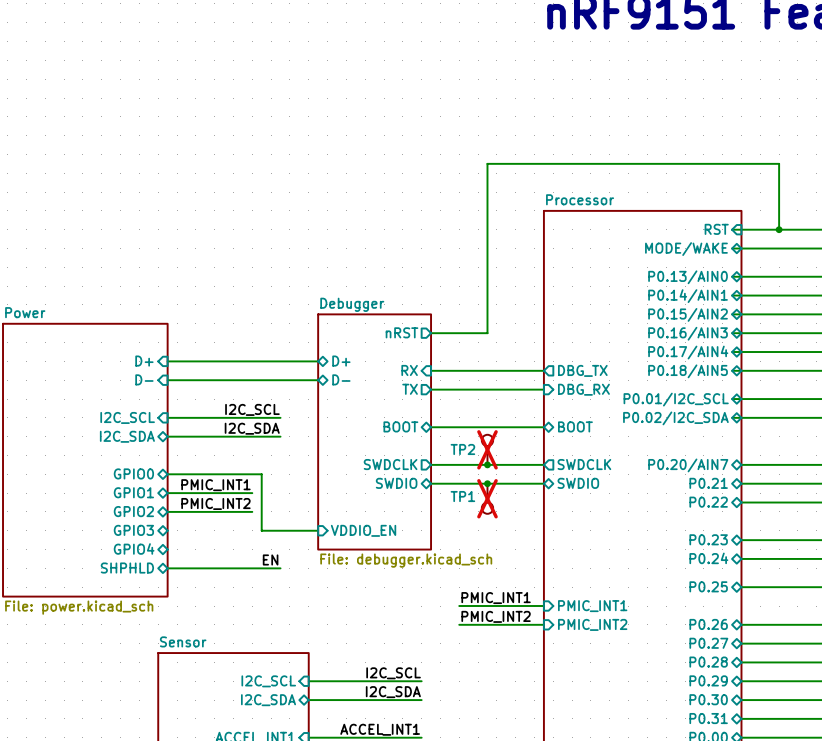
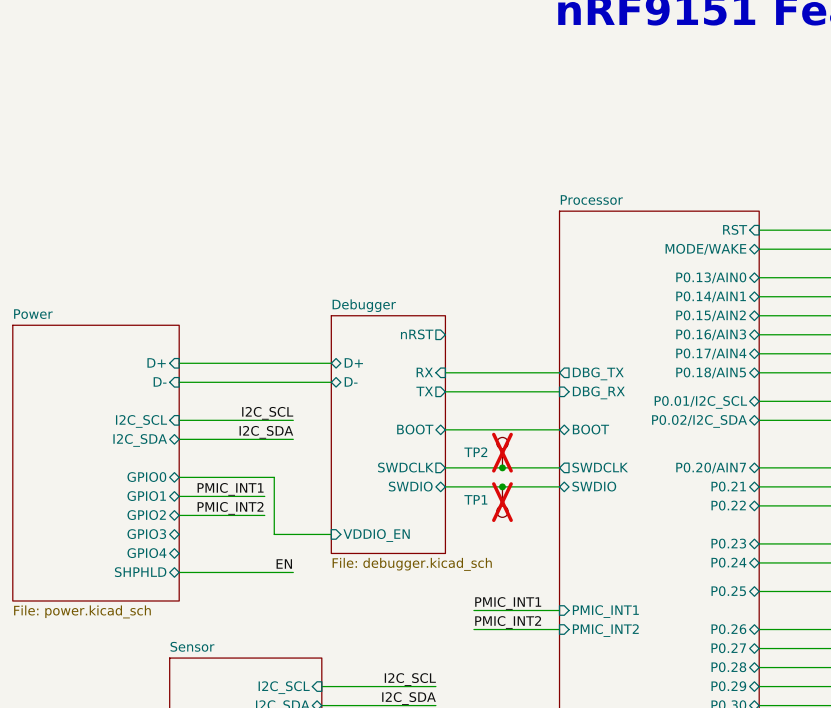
wire: (732, 229) (741, 229) -> none
wire: (779, 229) (779, 163) (487, 163) (487, 333) (431, 333) -> none
junction: (779, 229) -> none
wire: (732, 248) (741, 248) -> none
wire: (732, 276) (741, 276) -> none
wire: (732, 295) (741, 295) -> none
wire: (732, 314) (741, 314) -> none
wire: (732, 333) (741, 333) -> none
wire: (732, 352) (741, 352) -> none
wire: (732, 370) (741, 370) -> none
wire: (732, 399) (741, 399) -> none
wire: (732, 417) (741, 417) -> none

